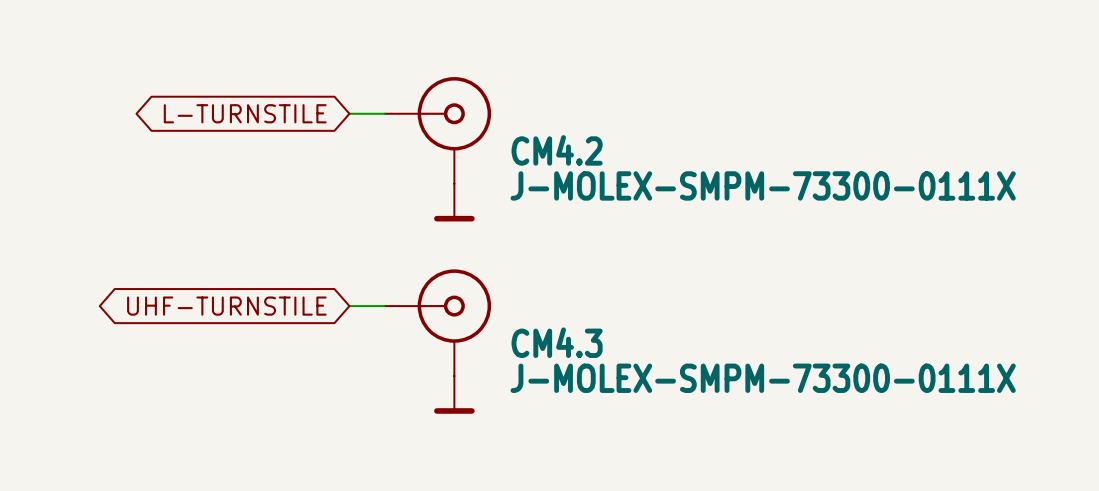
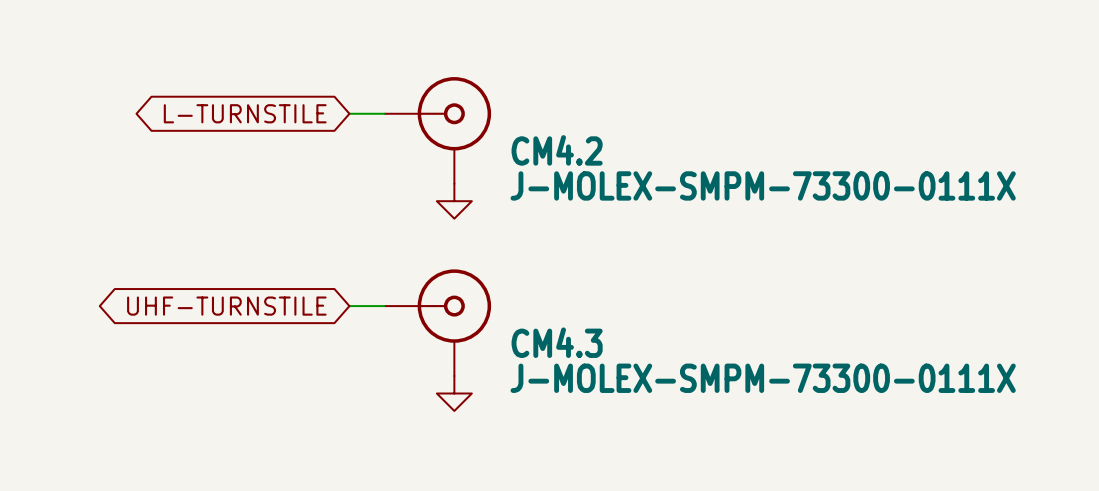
power symbol shape: [434, 183, 475, 222] -> [436, 183, 472, 219]
power symbol shape: [434, 376, 475, 414] -> [436, 376, 472, 411]

